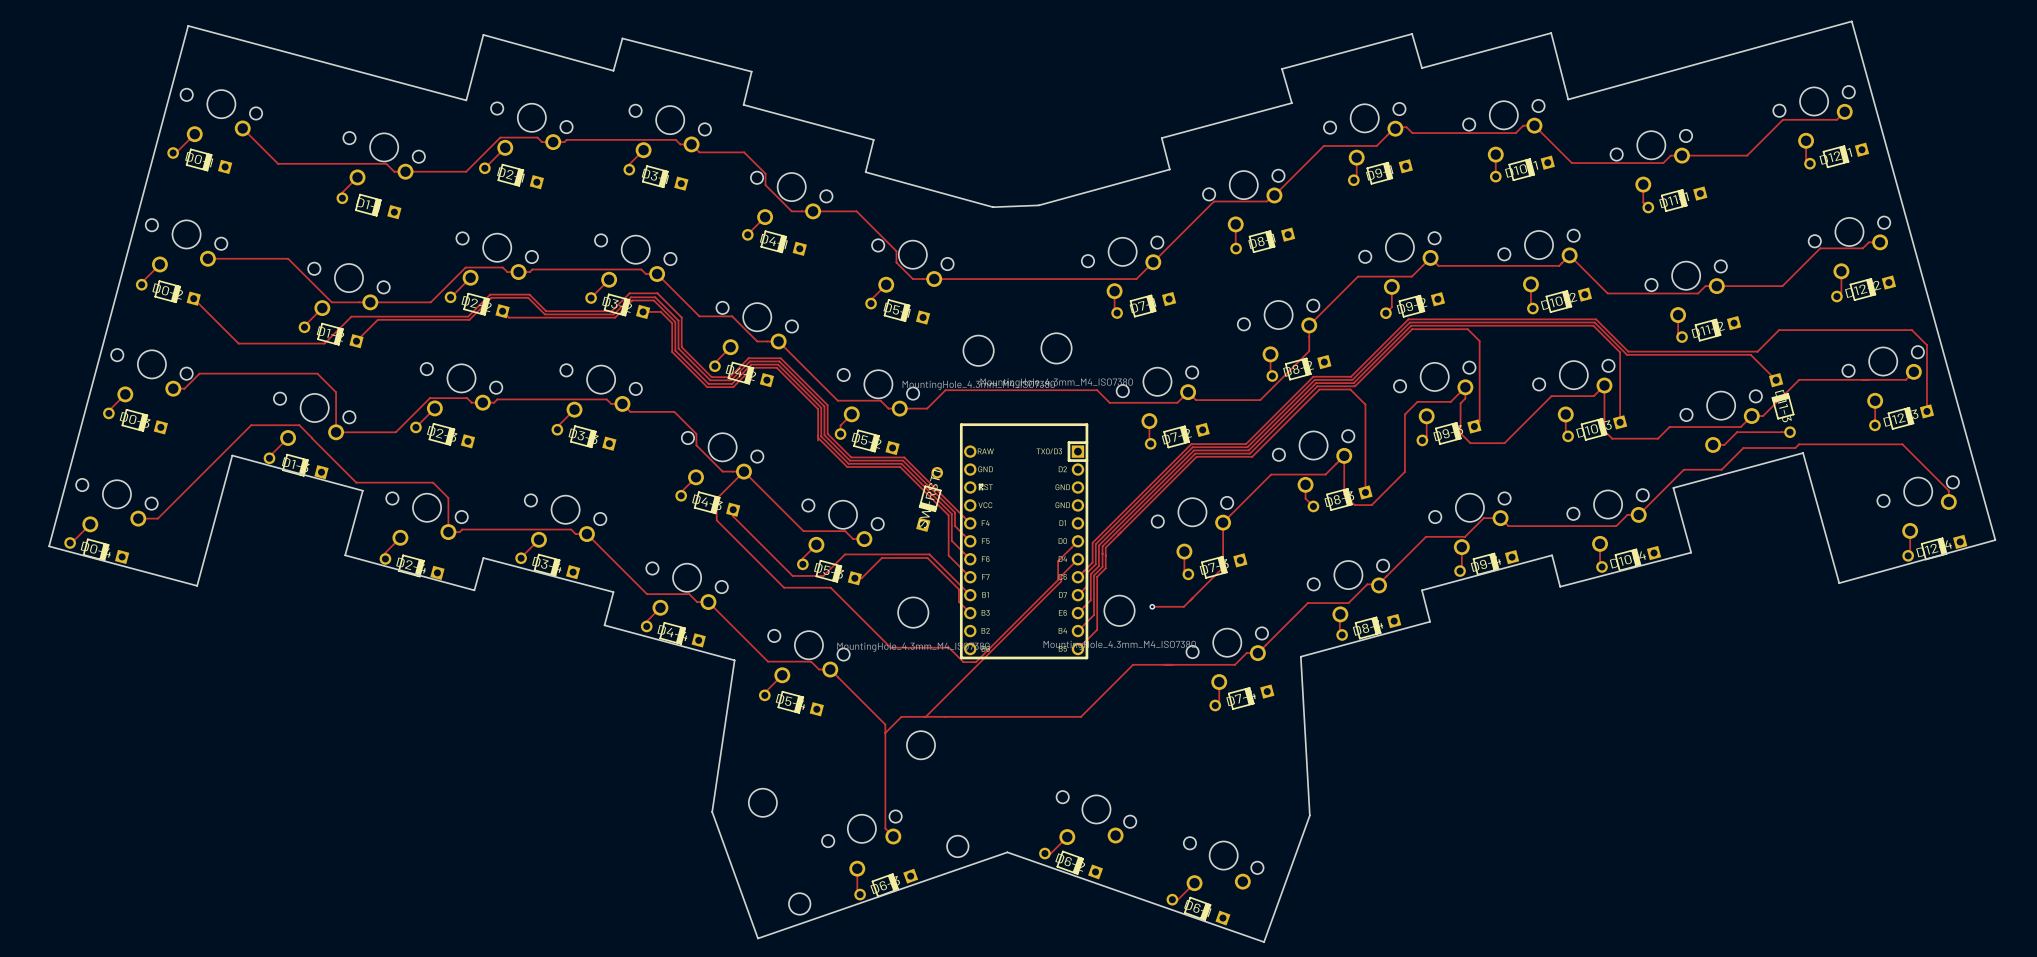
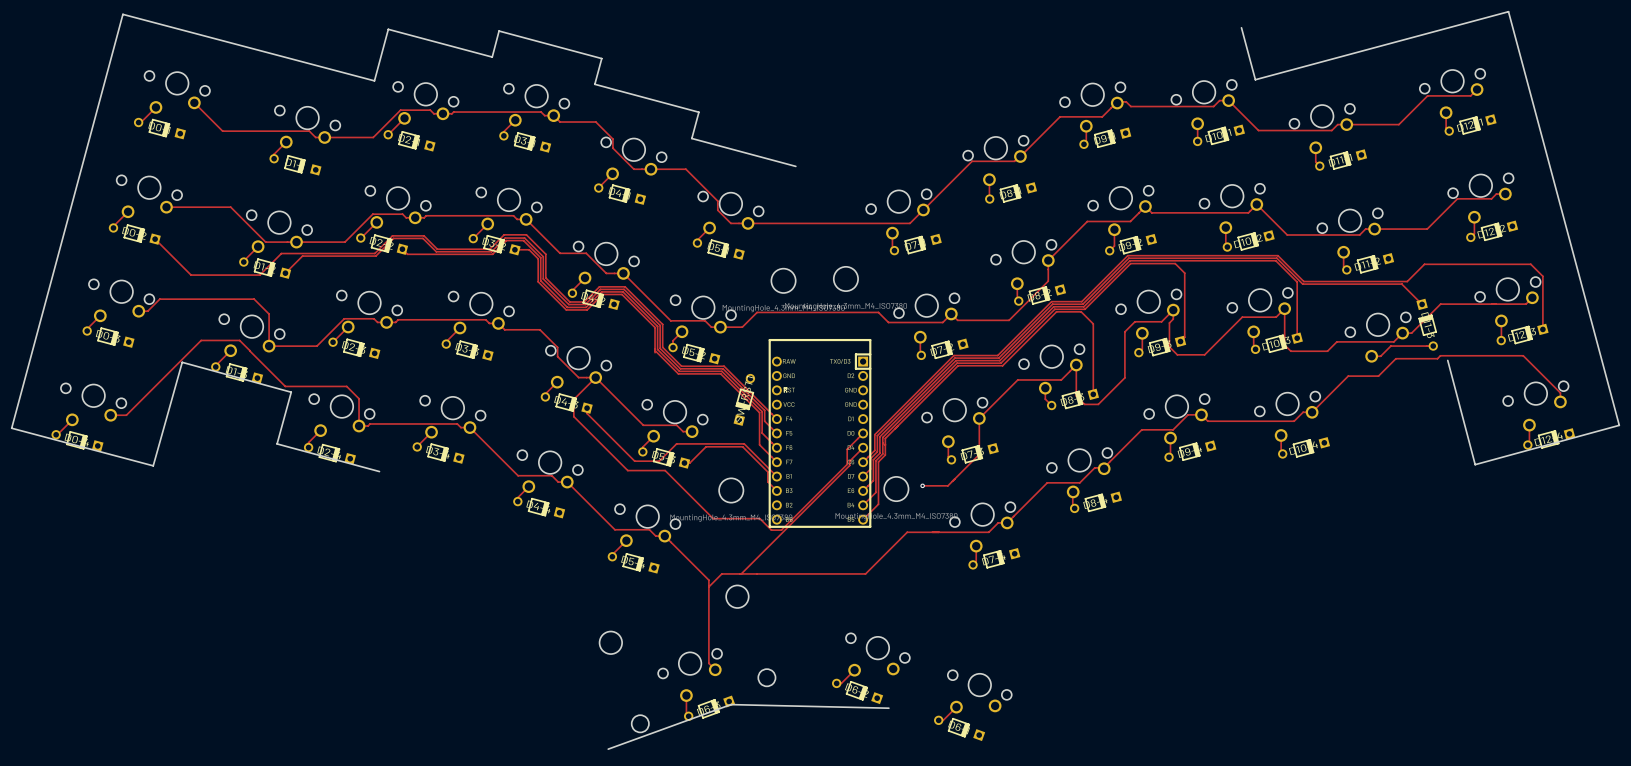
board edge: (1851, 21) (1568, 99) (1551, 33) (1421, 68) (1412, 33) (1282, 68) (1291, 103) (1161, 138) (1169, 169) (1038, 205) (993, 207) (865, 172) (873, 139) (743, 104) (751, 71) (622, 38) (613, 70) (483, 34) (466, 100) (188, 25) (49, 546) (197, 585) (232, 455) (362, 490) (345, 555) (474, 590) (483, 558) (613, 592) (604, 625) (734, 660) (712, 811) (757, 938) (1007, 852) (1264, 942) (1309, 815) (1300, 656) (1430, 621) (1421, 590) (1552, 555) (1560, 586) (1691, 552) (1673, 487) (1803, 453) (1839, 583) (1995, 540) (1851, 21) -> none
board edge: none -> (1241, 27) (1255, 79) (1508, 11) (1619, 425)
board edge: none -> (795, 166) (691, 138) (698, 112) (594, 84) (601, 58) (499, 31) (492, 57) (388, 29) (374, 80) (122, 14) (11, 428)
board edge: none -> (1447, 360) (1475, 464) (1619, 425)
board edge: none -> (11, 428) (153, 465) (182, 362) (291, 392) (277, 443) (379, 471)
board edge: none -> (888, 708) (730, 704) (608, 749)

